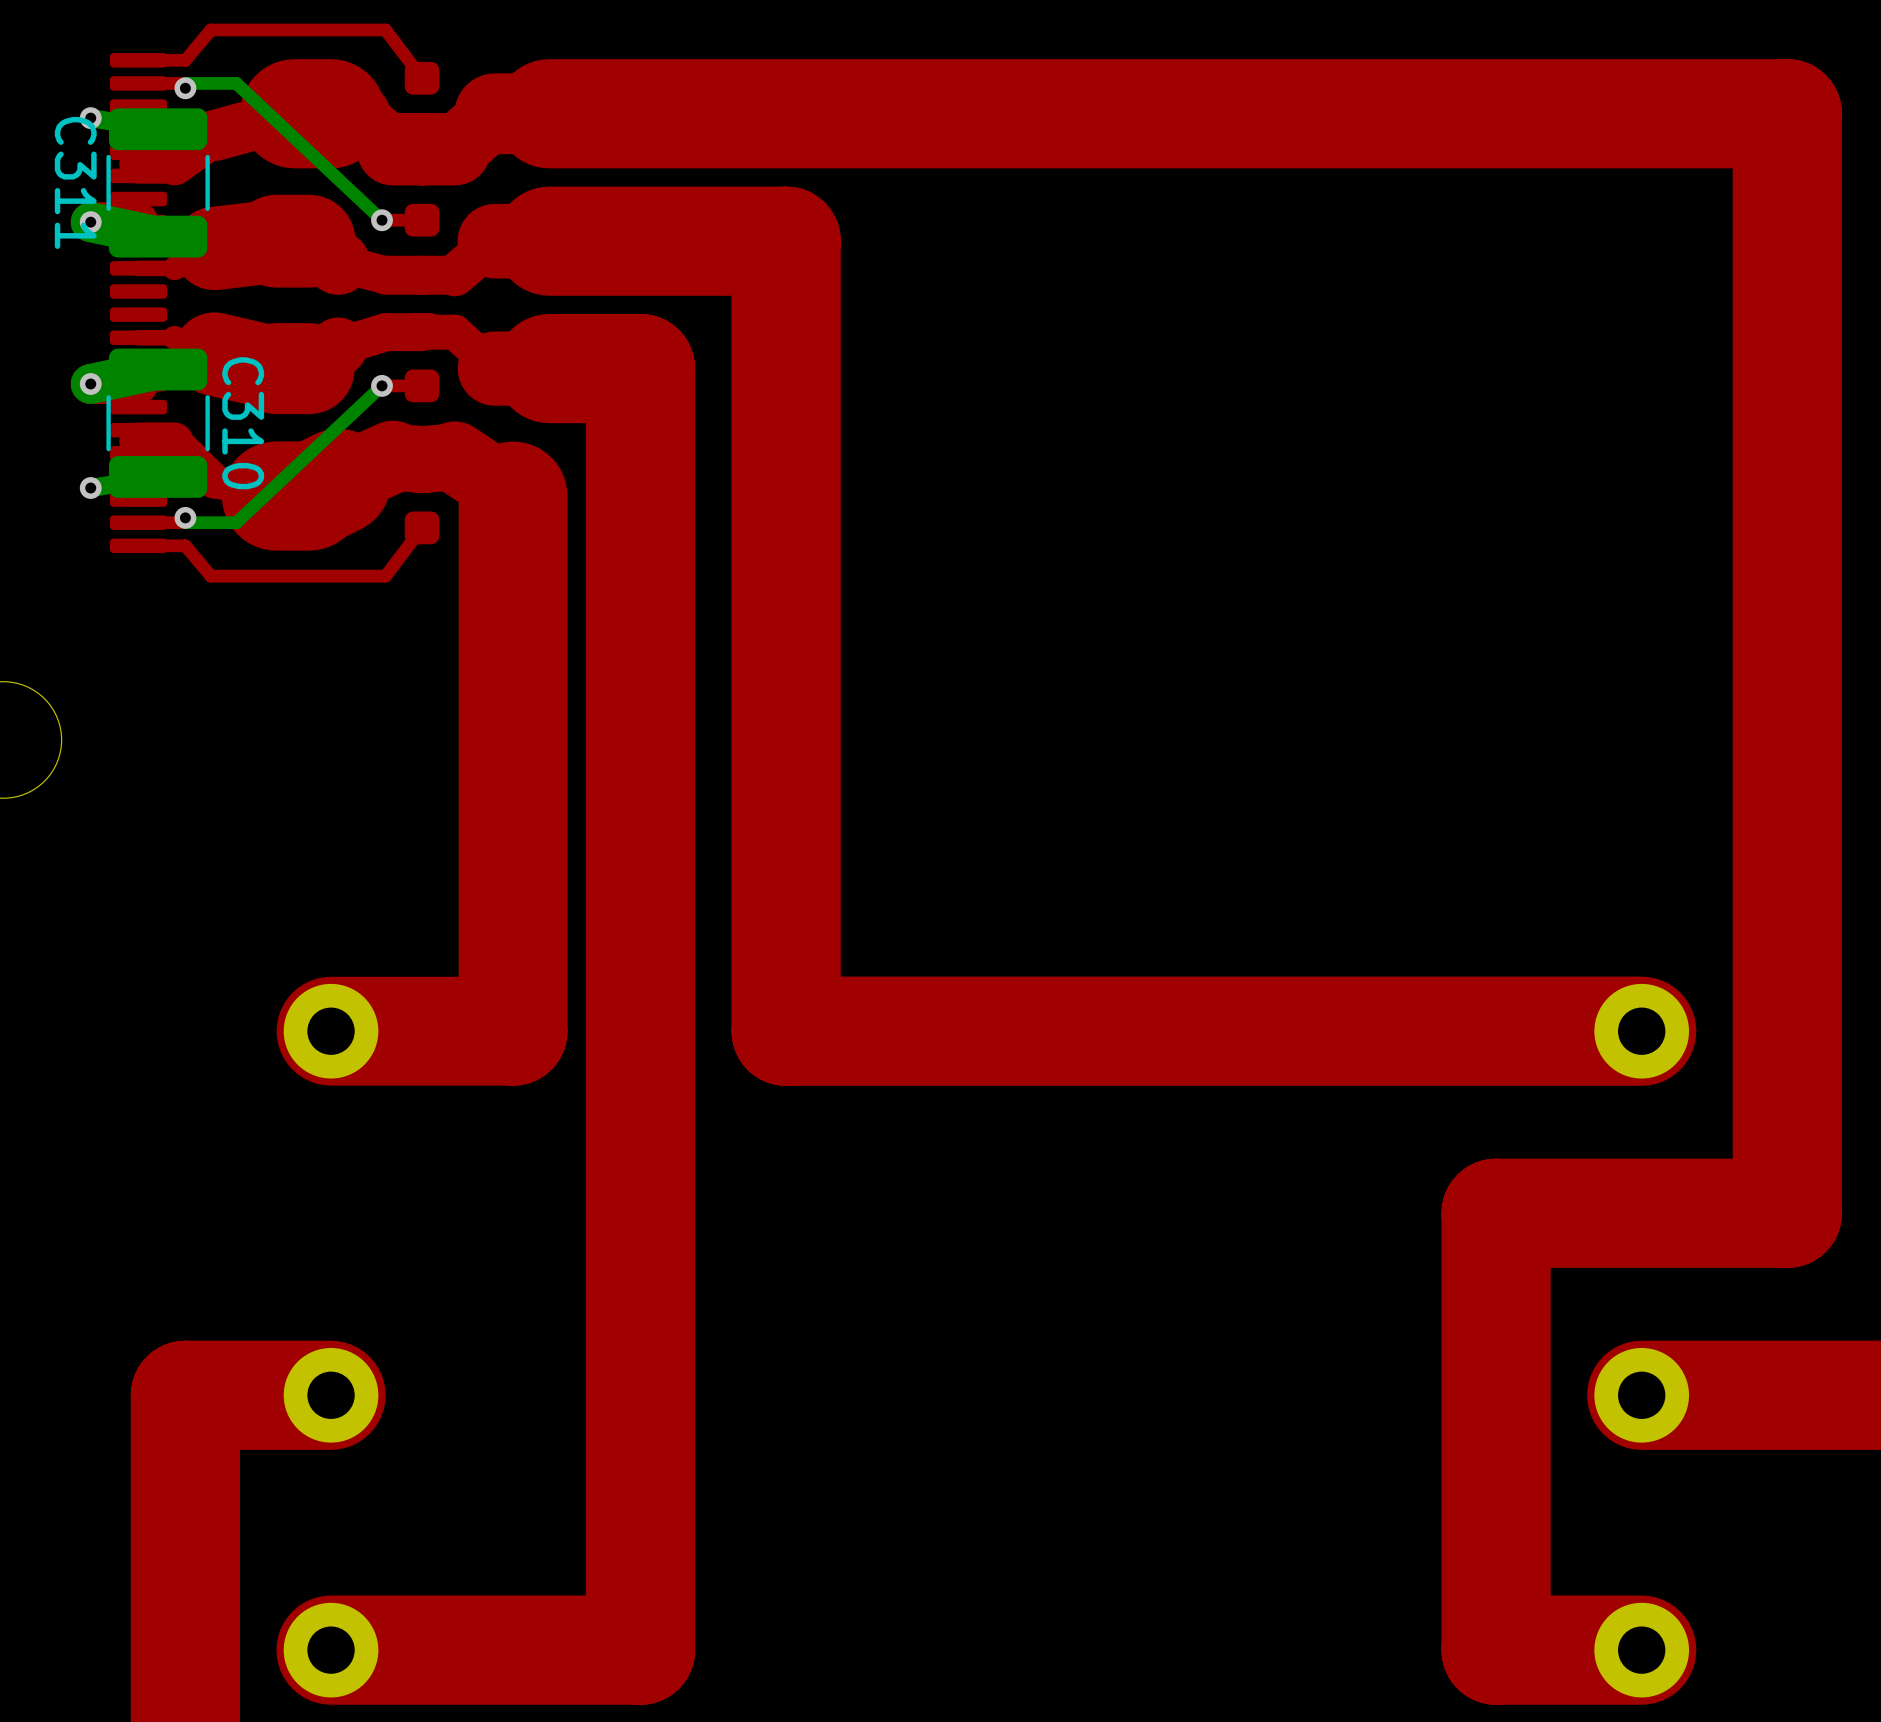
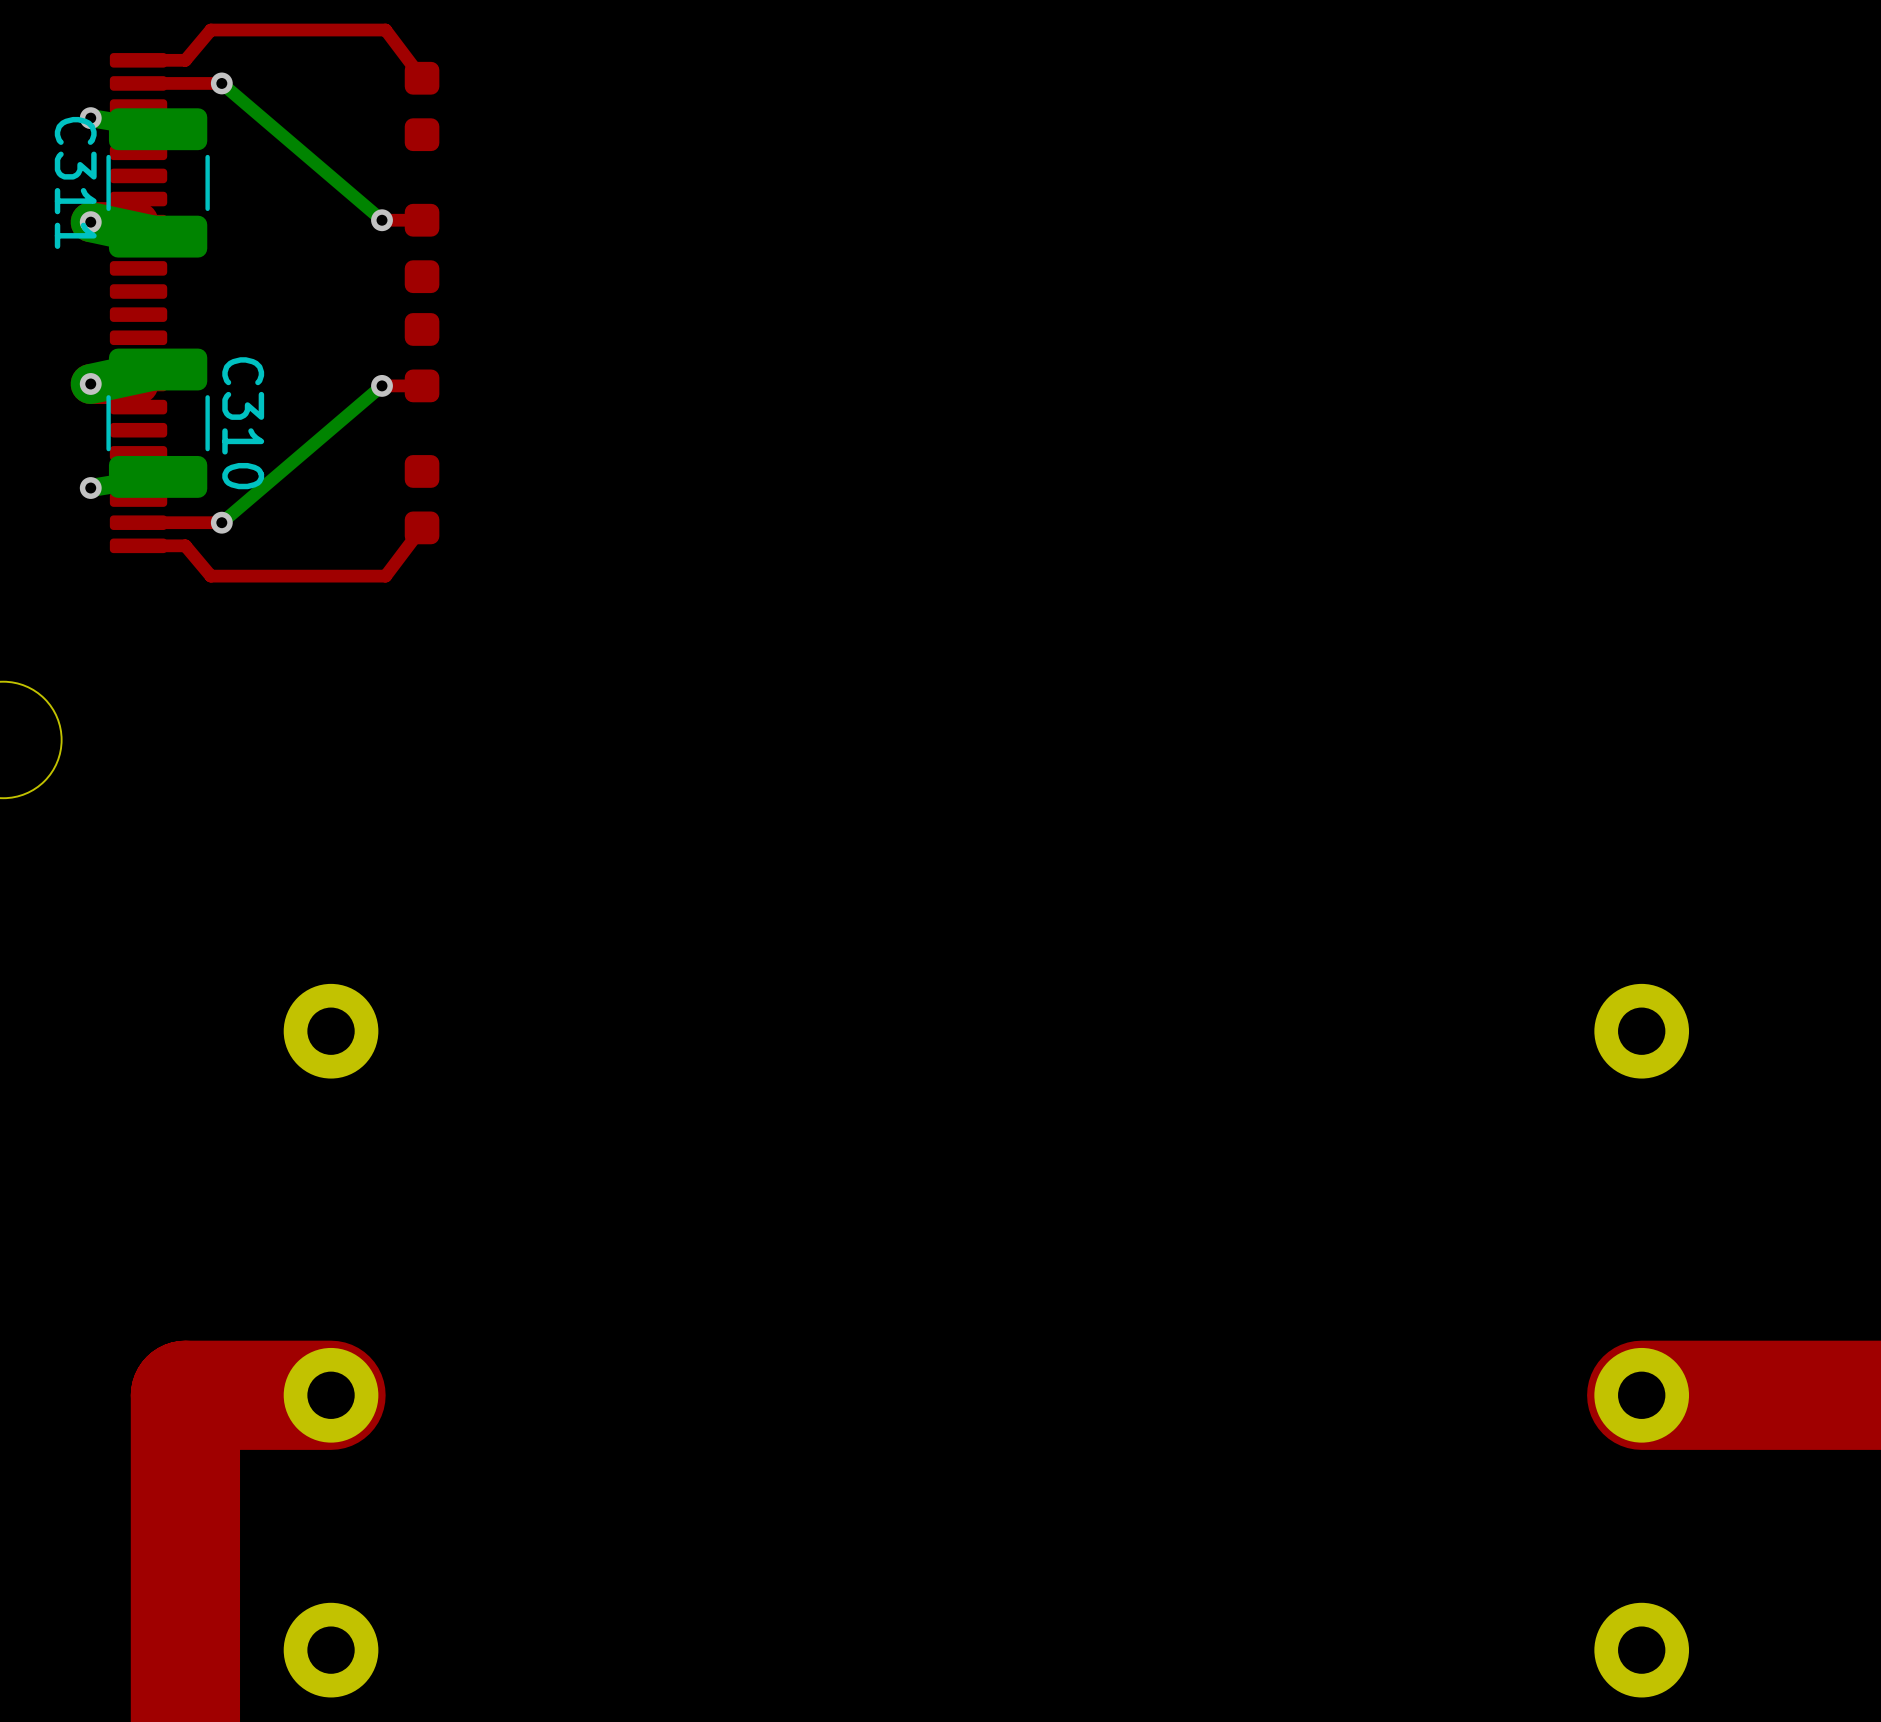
bottom track: (185, 83) (236, 83) (382, 220) -> (221, 83) (382, 220)
top track: none -> (221, 83) (185, 83)
via position: (185, 88) -> (221, 83)
top track: (138, 164) (174, 164) (214, 135) (294, 113) (331, 113) (356, 117) (392, 149) (454, 149) (494, 113) (1787, 113) (1787, 1213) (1496, 1213) (1496, 1650) (1641, 1650) -> none
top track: (138, 268) (174, 268) (214, 248) (276, 241) (309, 241) (338, 263) (385, 275) (454, 275) (494, 241) (786, 241) (786, 1031) (1641, 1031) -> none
top track: (138, 337) (174, 337) (214, 354) (276, 368) (309, 368) (338, 346) (385, 332) (454, 332) (494, 368) (640, 368) (640, 1650) (331, 1650) -> none
bottom track: (382, 385) (236, 522) (185, 522) -> (382, 385) (221, 522)
top track: (138, 441) (174, 441) (214, 481) (276, 496) (309, 496) (392, 456) (422, 459) (454, 456) (513, 496) (513, 1031) (331, 1031) -> none
via position: (185, 517) -> (221, 522)
top track: none -> (221, 522) (185, 522)

